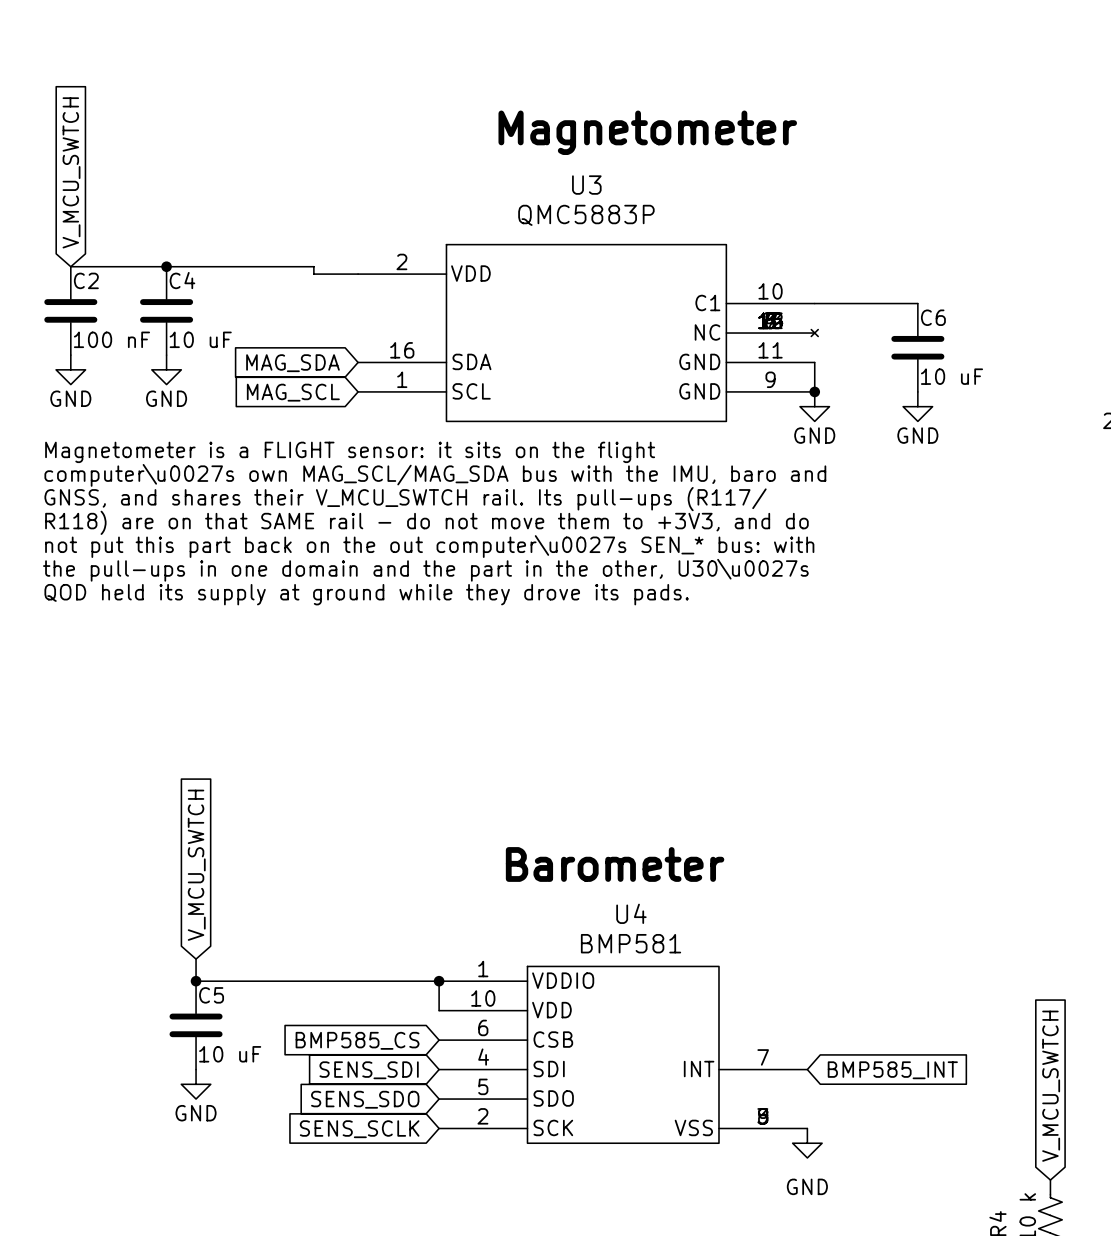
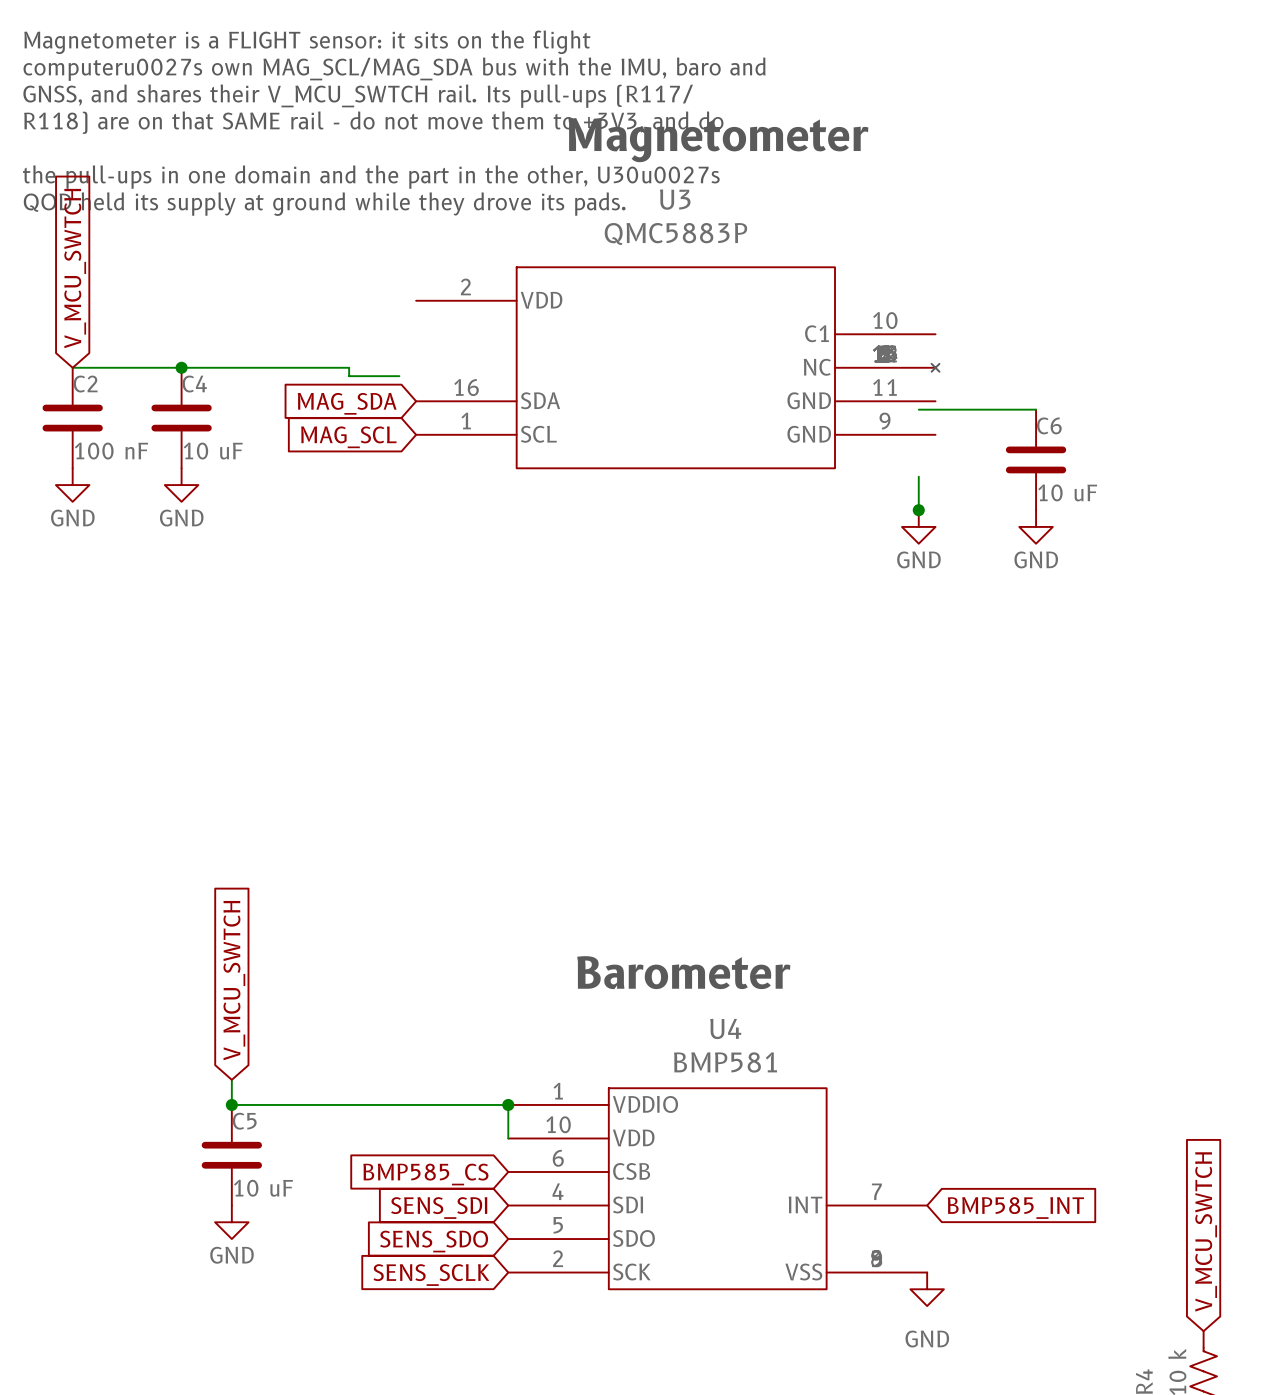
text: none -> Magnetometer is a FLIGHT sensor: it sits on the flight (307, 42)
text: none -> computeru0027s own MAG_SCL/MAG_SDA bus with the IMU, baro and (394, 69)
text: none -> GNSS, and shares their V_MCU_SWTCH rail. Its pull-ups (R117/ (358, 96)
text: none -> R118) are on that SAME rail - do not move them to +3V3, and do (373, 122)
text: none -> the pull-ups in one domain and the part in the other, U30u0027s (371, 177)
global label position: V_MCU_SWTCH (71, 172) -> V_MCU_SWTCH (75, 268)
text: none -> QOD held its supply at ground while they drove its pads. (324, 204)
wire: (70, 266) (313, 266) (313, 274) (358, 274) -> (72, 367) (349, 367) (349, 376) (399, 376)
junction position: (166, 266) -> (181, 367)
wire: (814, 303) (917, 303) -> (918, 409) (1036, 409)
C2 position: (70, 310) -> (72, 418)
C4 position: (166, 310) -> (181, 418)
C6 position: (917, 347) -> (1036, 459)
wire: (814, 362) (814, 391) -> (918, 476) (918, 510)
power symbol: GND (70, 369) -> none
power symbol: GND (166, 369) -> none
junction position: (814, 391) -> (918, 510)
power symbol: GND (814, 406) -> none
power symbol: GND (917, 406) -> none
power symbol: none -> GND (72, 485)
power symbol: none -> GND (181, 485)
text: Magnetometer is a FLIGHT sensor: it sits on the flight (350, 452) -> none
power symbol: none -> GND (918, 526)
power symbol: none -> GND (1036, 526)
text: computer\u0027s own MAG_SCL/MAG_SDA bus with the IMU, baro and (435, 475) -> none
text: GNSS, and shares their V_MCU_SWTCH rail. Its pull-ups (R117/ (405, 499) -> none
text: R118) are on that SAME rail - do not move them to +3V3, and do (426, 522) -> none
text: not put this part back on the out computer\u0027s SEN_* bus: with (429, 546) -> none
text: the pull-ups in one domain and the part in the other, U30\u0027s (425, 570) -> none
text: QOD held its supply at ground while they drove its pads. (366, 594) -> none

